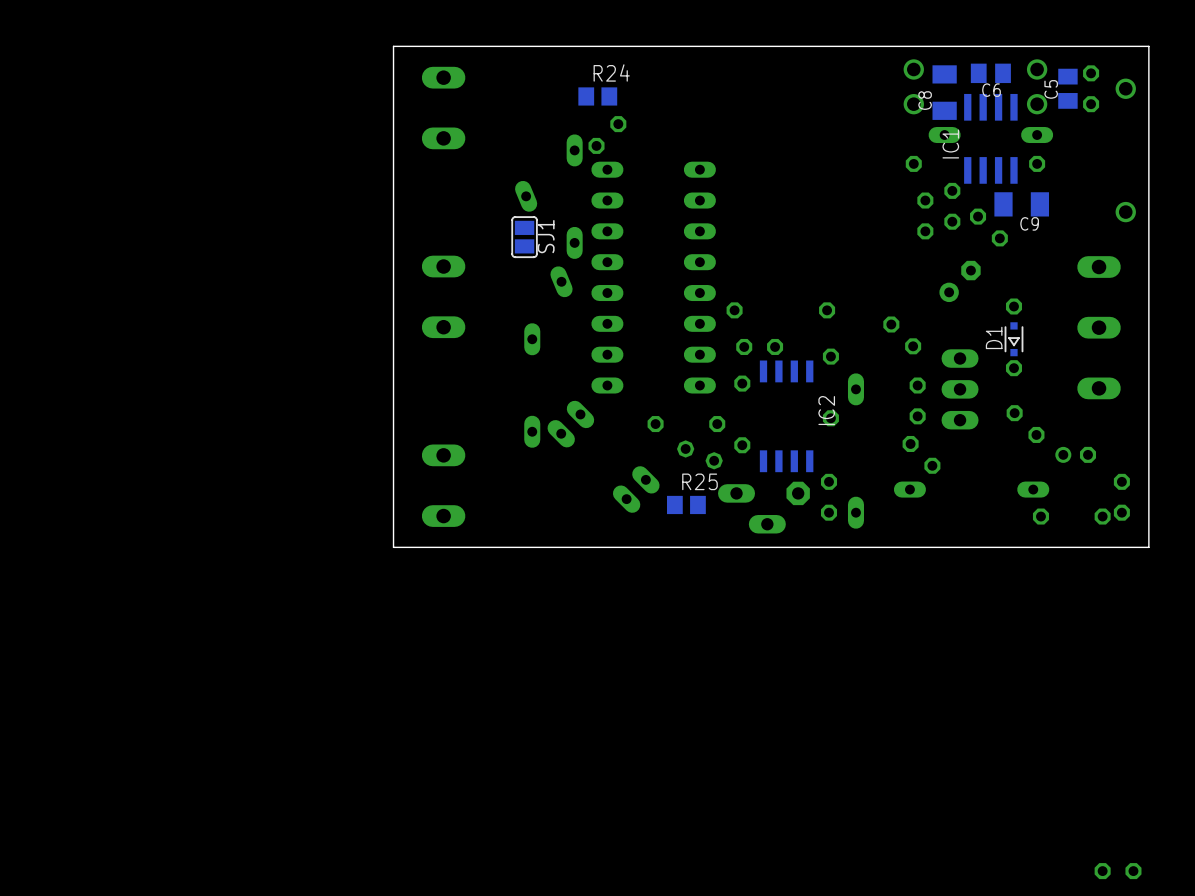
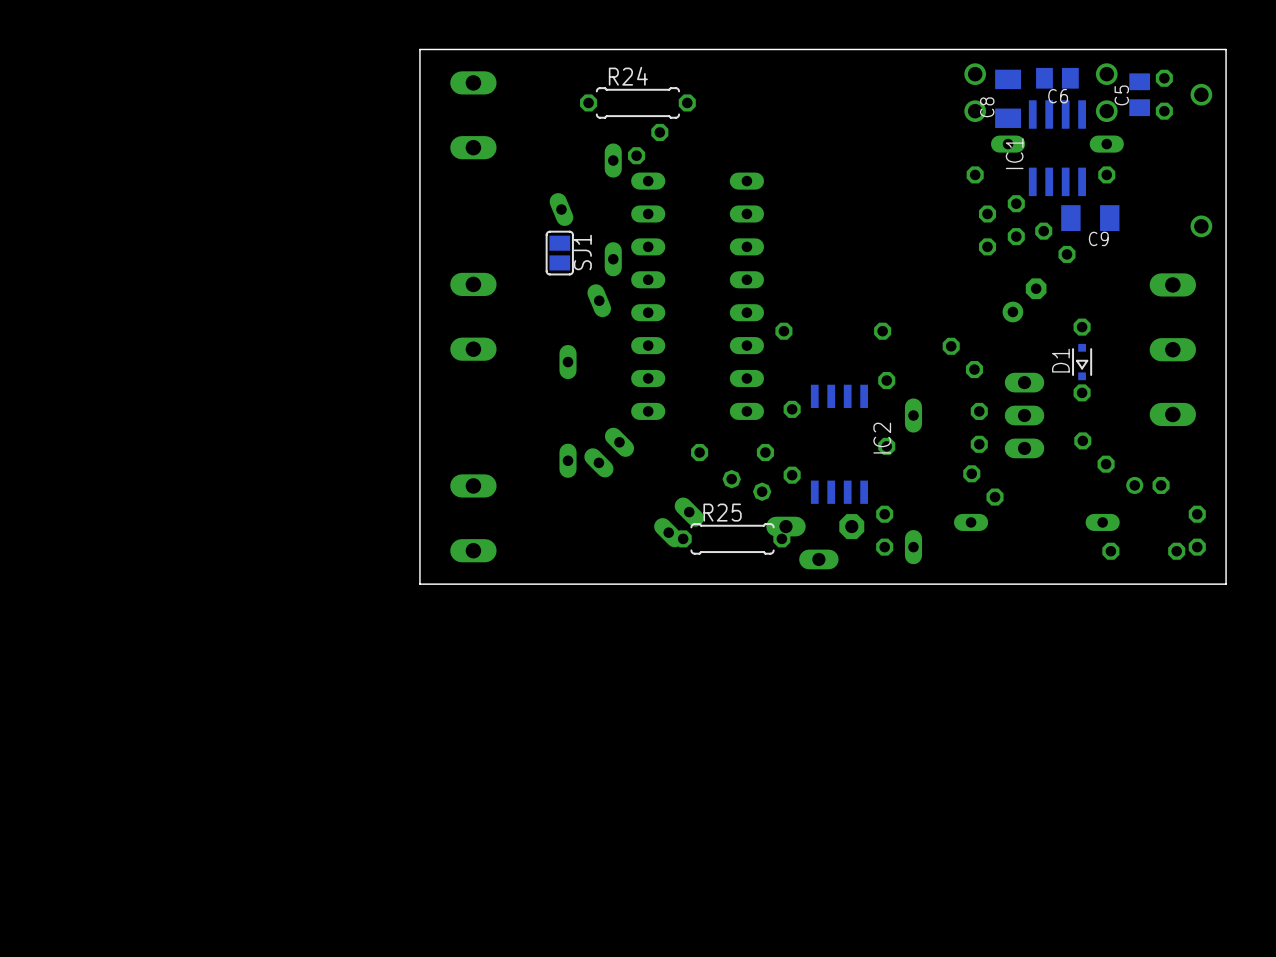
R24 footprint: [578, 87, 618, 106] -> [580, 87, 696, 119]
part: (759, 346) -> none
R25 footprint: [666, 495, 706, 515] -> [674, 523, 791, 555]
part: (1118, 871) -> none

